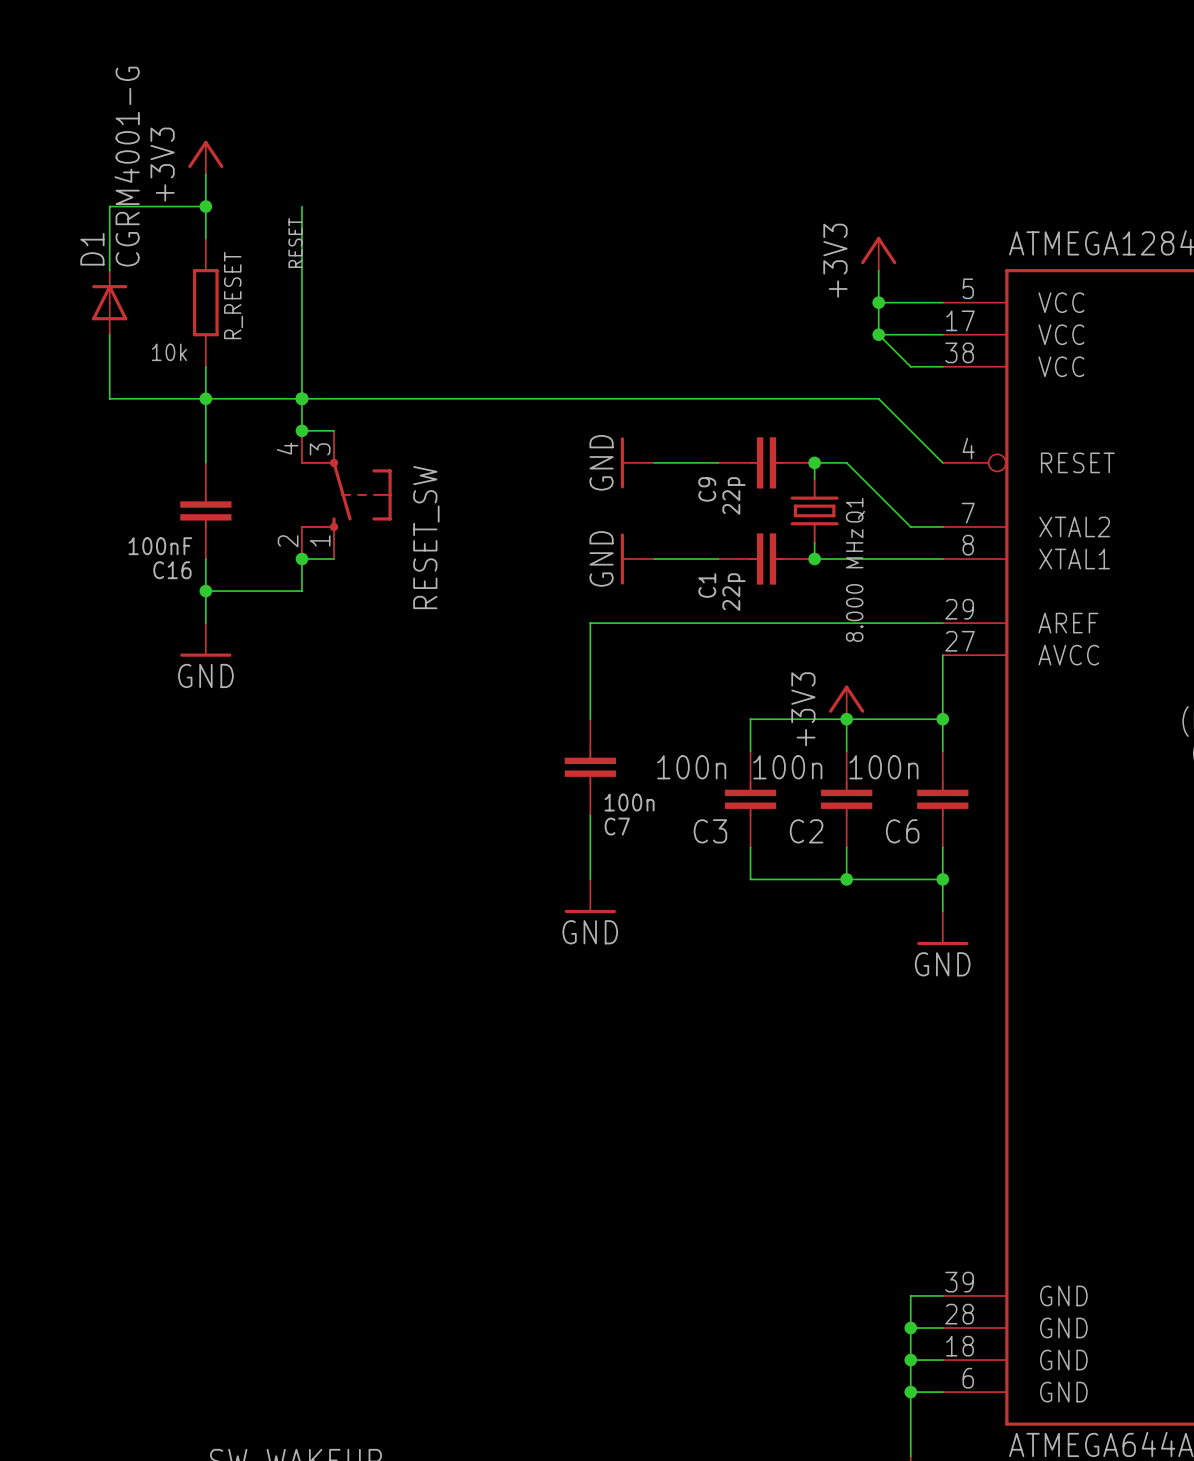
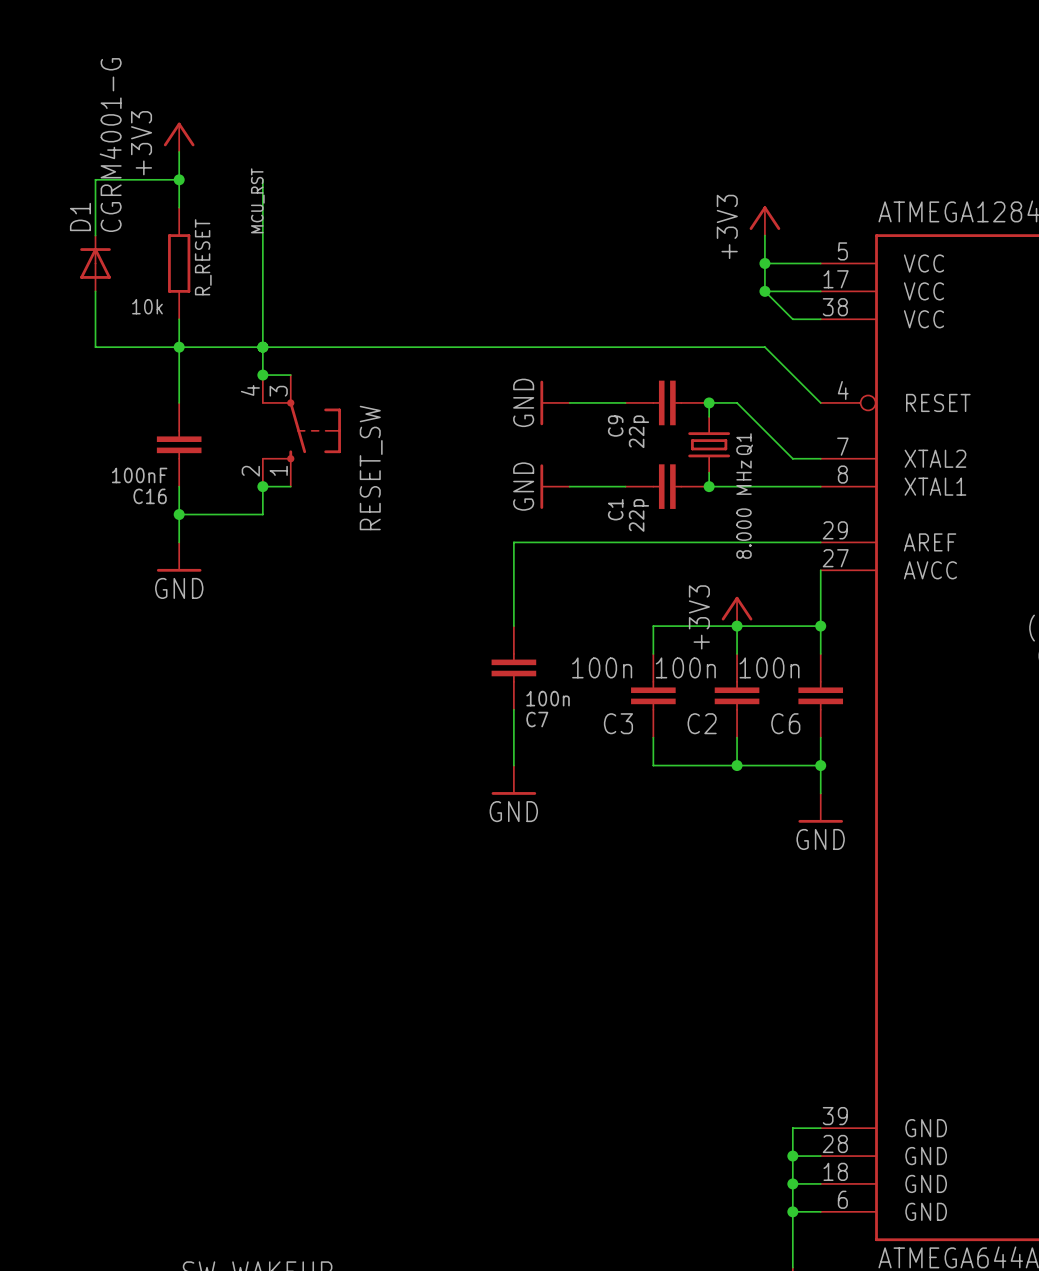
label: RESET (295, 243) -> MCU_RST (257, 200)

